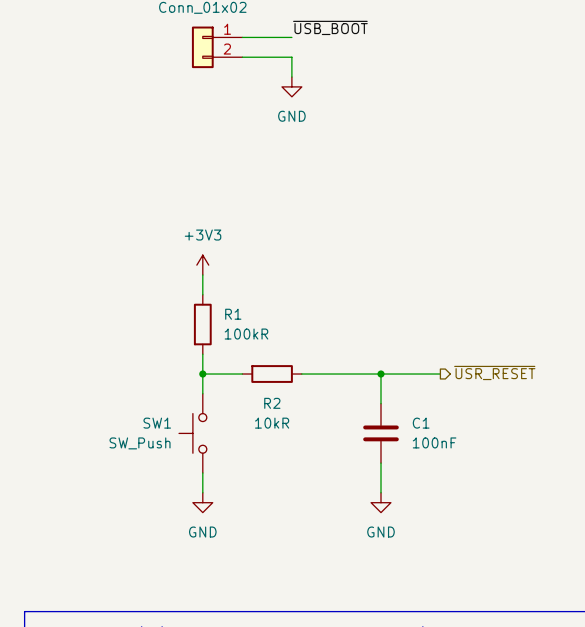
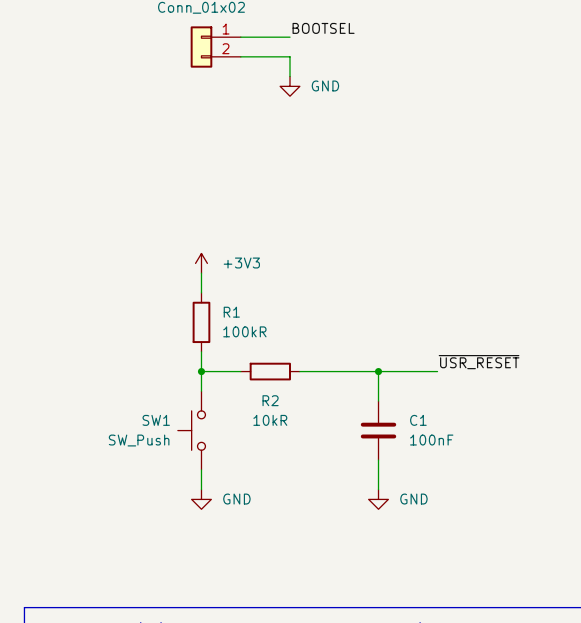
label: ~{USB_BOOT} (330, 27) -> BOOTSEL (323, 28)
power symbol text position: GND (291, 116) -> GND (325, 85)
power symbol text position: +3V3 (203, 235) -> +3V3 (241, 263)
label: none -> ~{USR_RESET} (479, 362)
hierarchical label: ~{USR_RESET} (494, 372) -> none
power symbol text position: GND (202, 532) -> GND (236, 499)
power symbol text position: GND (381, 532) -> GND (413, 499)

